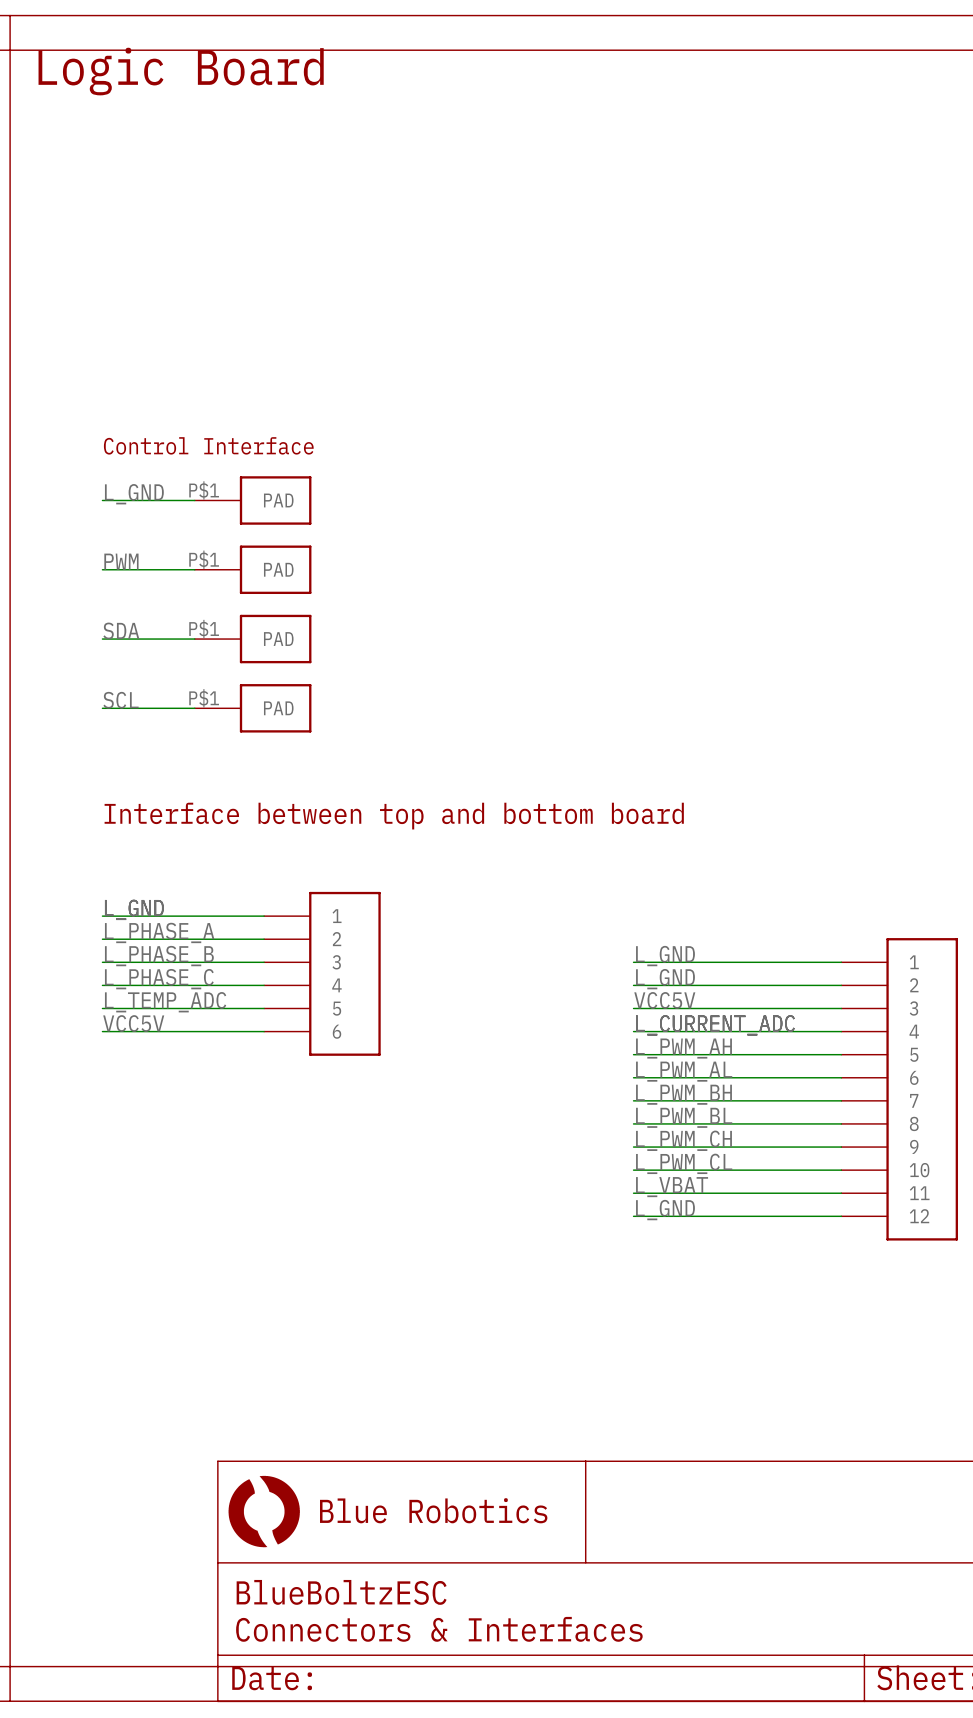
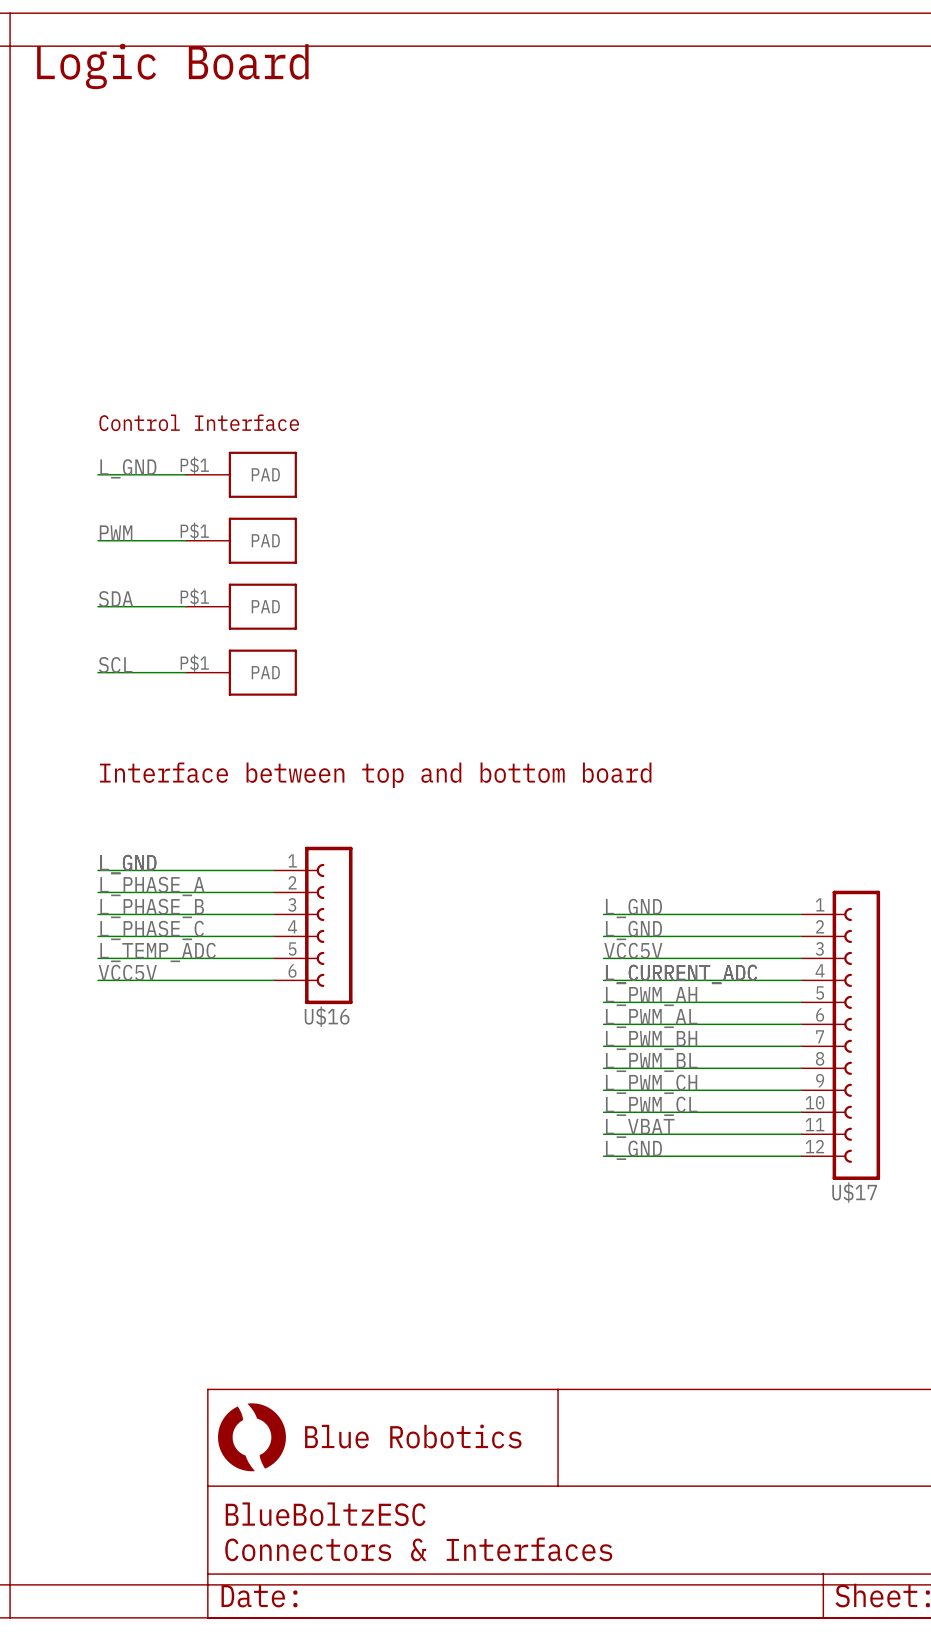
part: (322, 973) -> none
U$16: none -> (313, 925)
U$17: none -> (840, 1035)
part: (899, 1089) -> none

